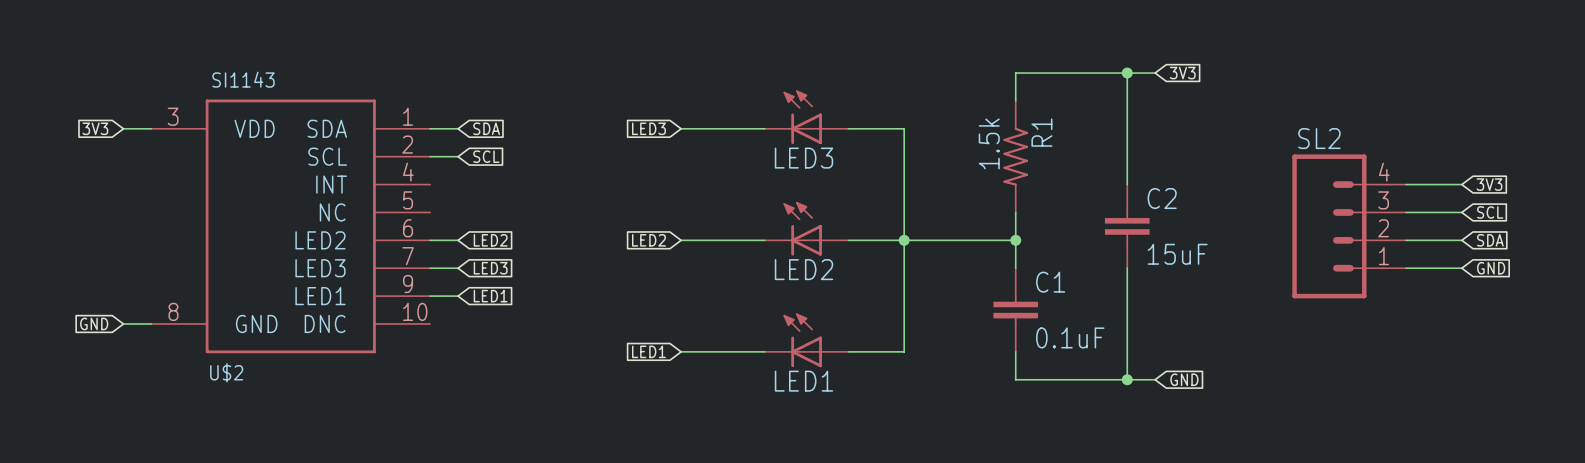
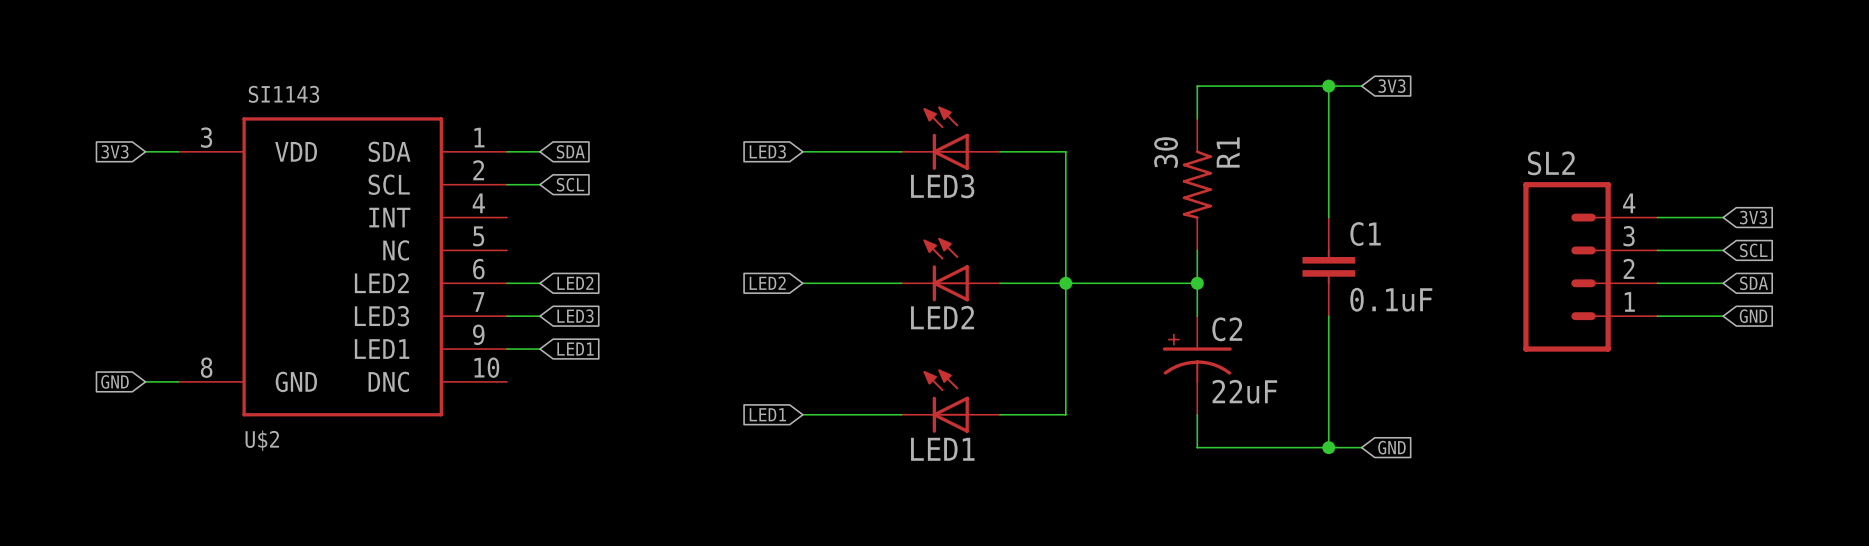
R1 value: 1.5k (989, 143) -> 30 (1166, 152)
C2 name: C2 (1162, 198) -> C1 (1365, 234)
C2 value: 15uF (1177, 254) -> 0.1uF (1391, 299)
C1: 0.1uF (1015, 310) -> none
C2: none -> 22uF (1197, 365)

